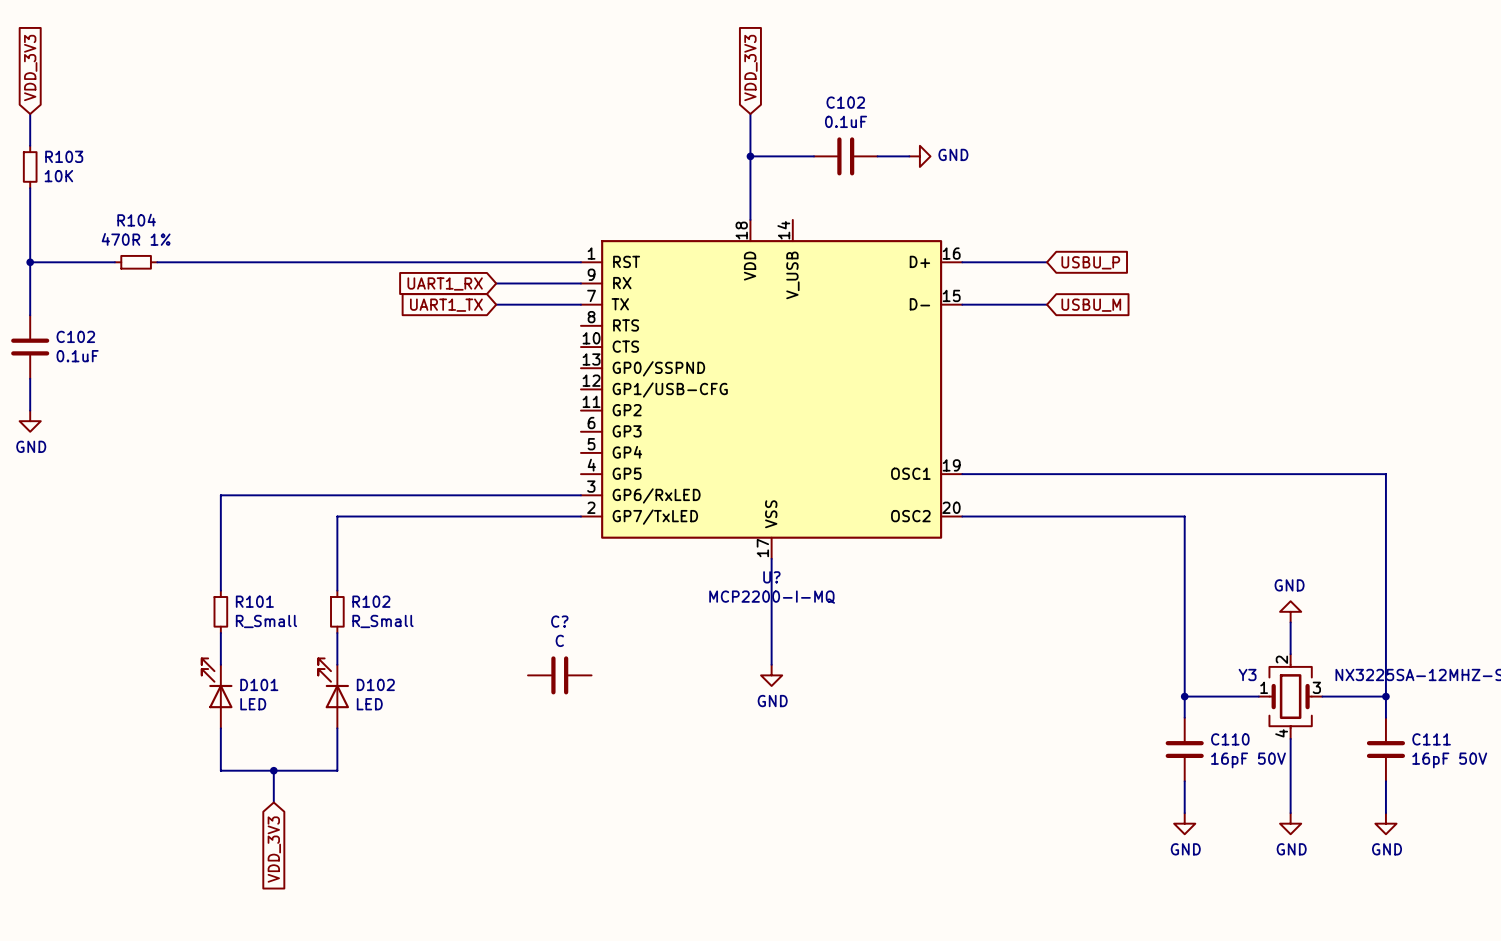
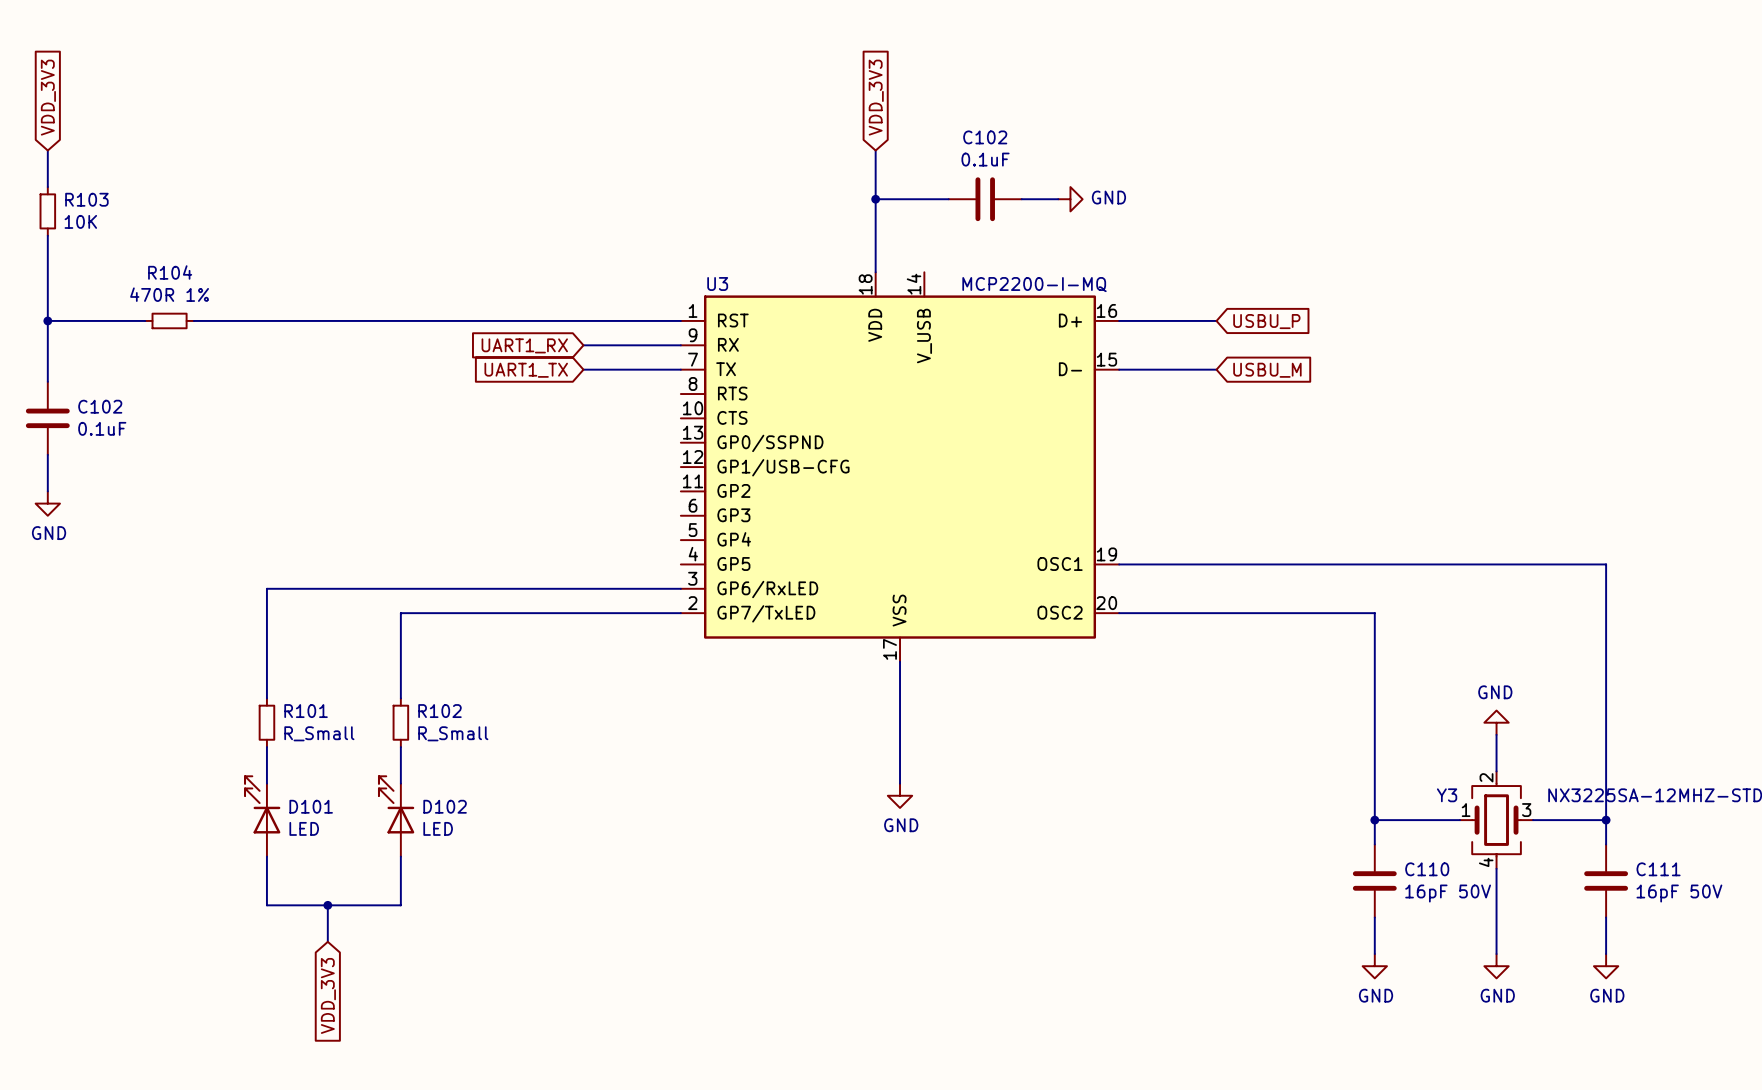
U? name: U? (771, 577) -> U3 (717, 283)
U? value position: MCP2200-I-MQ (772, 597) -> MCP2200-I-MQ (1034, 284)
C?: C (559, 675) -> none

